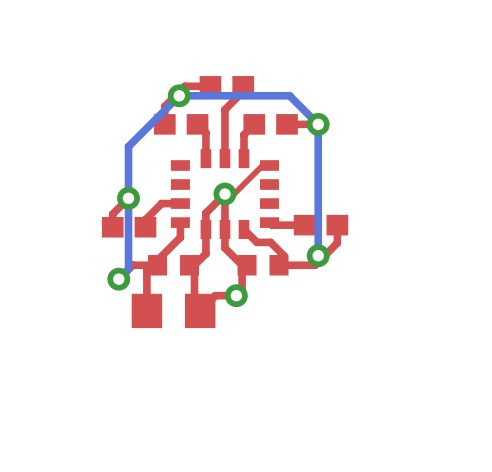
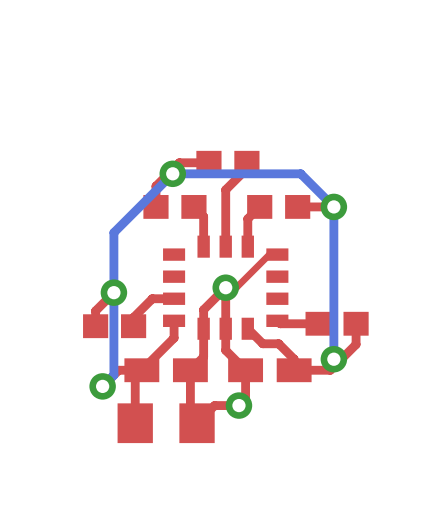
part footprint: [148, 254, 200, 276] -> [124, 358, 208, 383]
part footprint: [237, 254, 289, 276] -> [228, 358, 312, 383]

